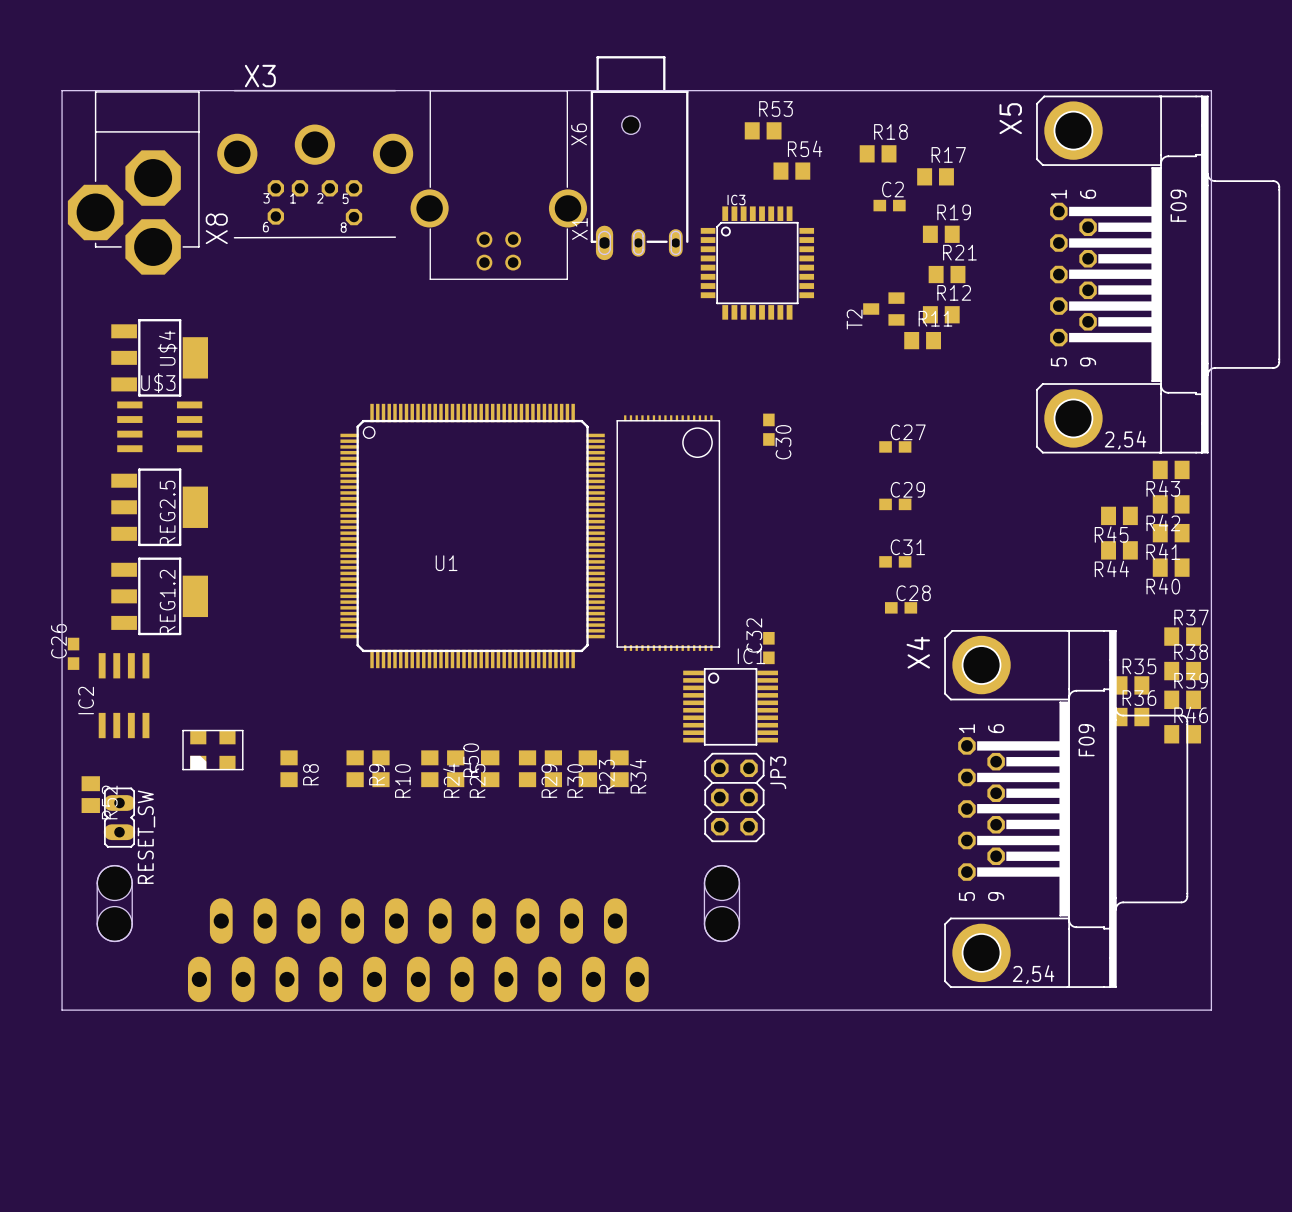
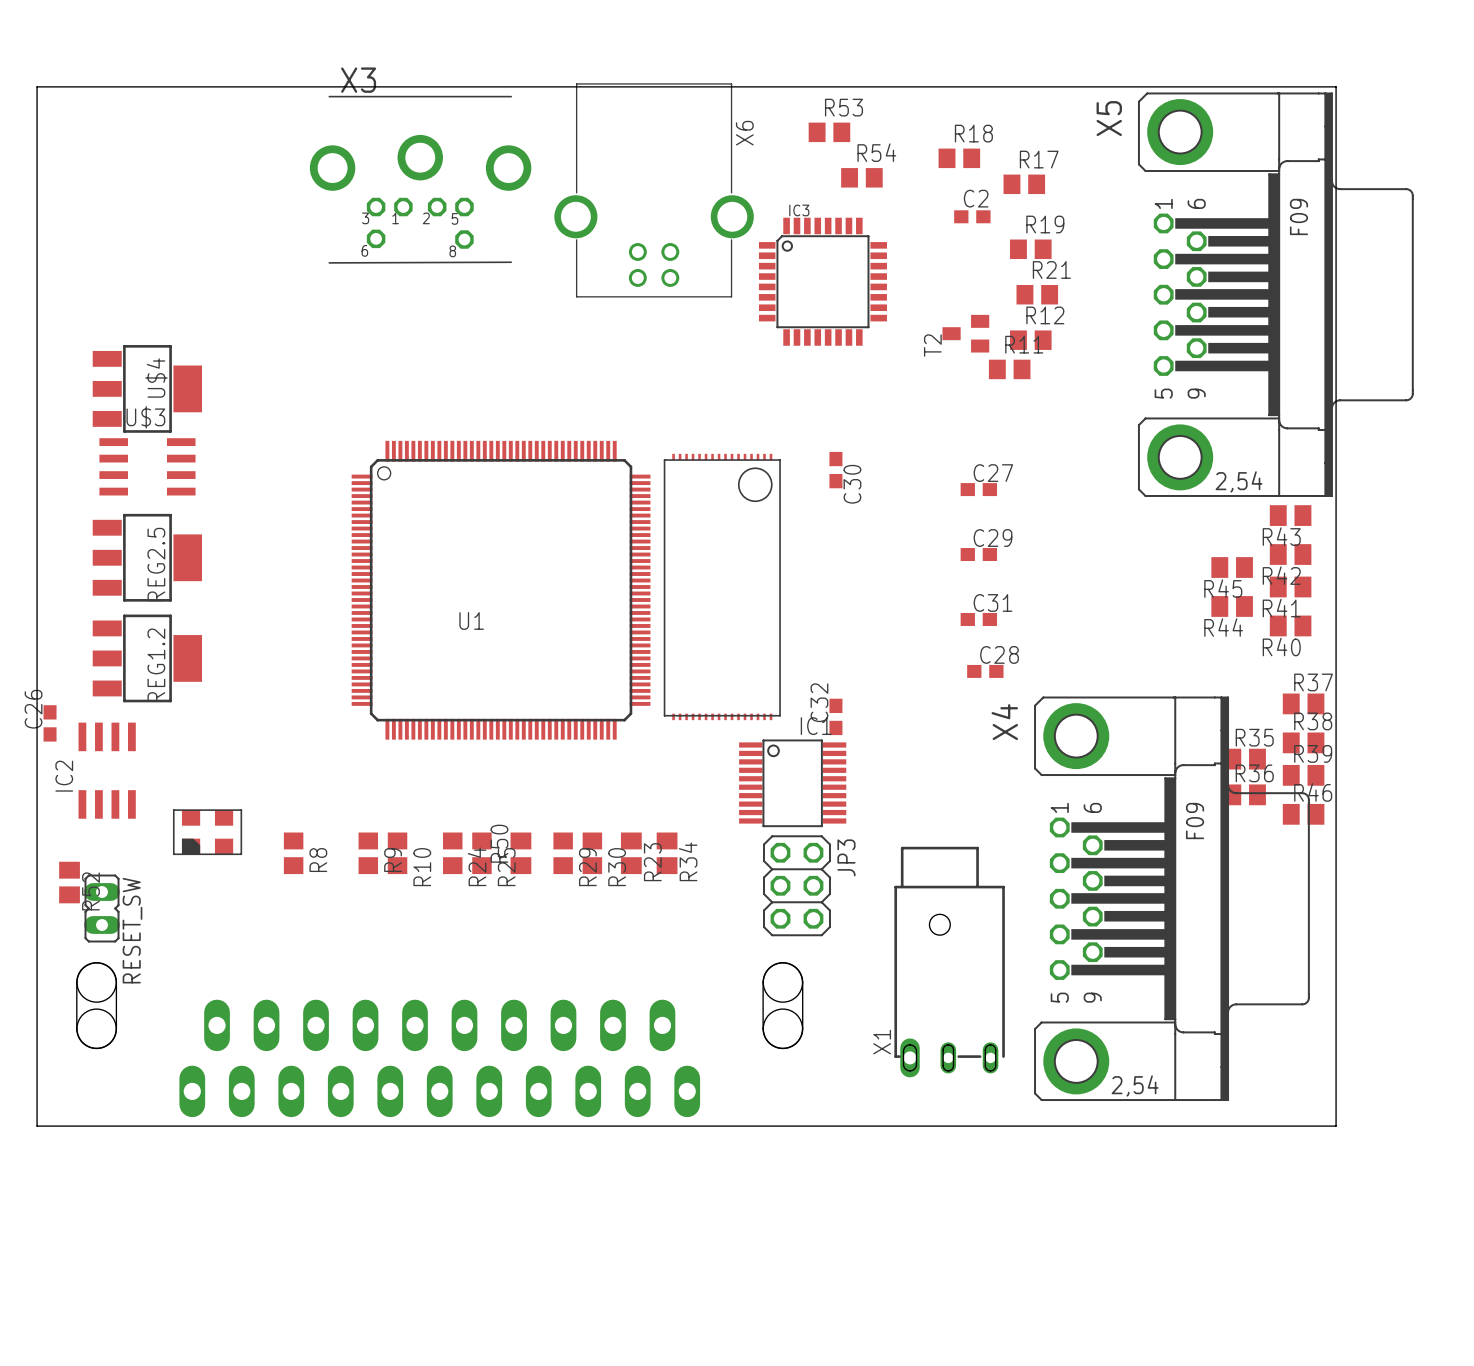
X1 position: (639, 158) -> (949, 962)
X3 position: (315, 164) -> (420, 179)
X8: (133, 182) -> none
X6 position: (498, 185) -> (654, 190)

